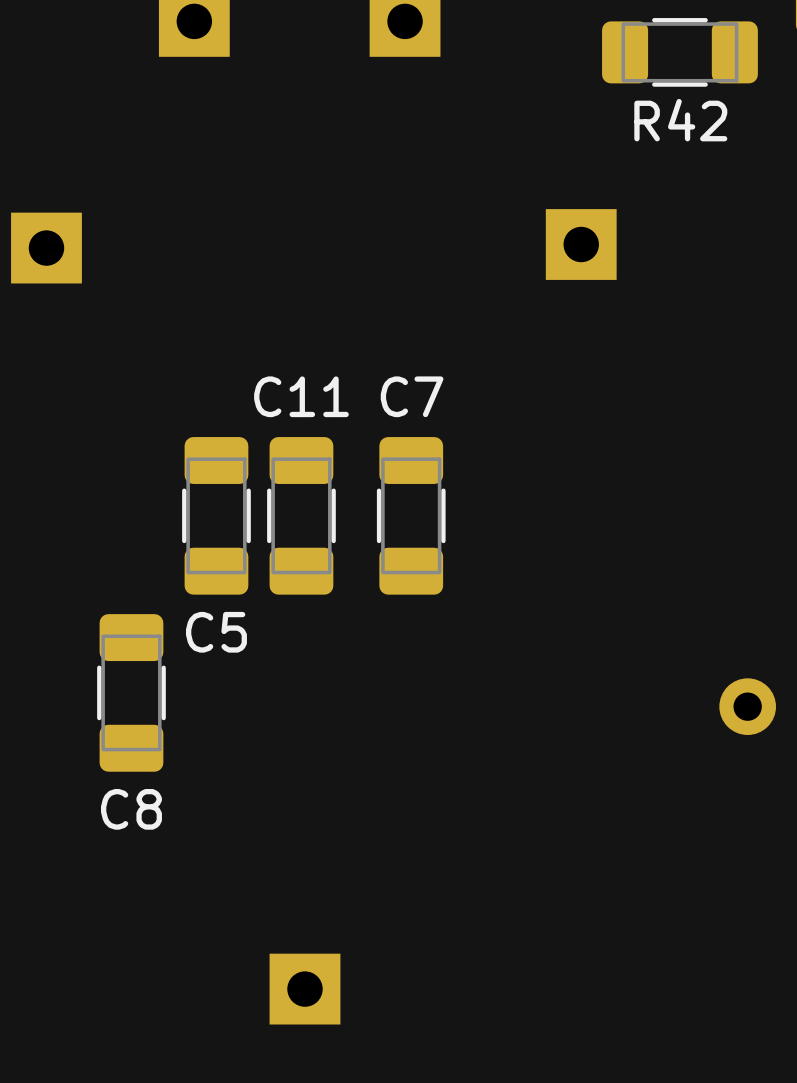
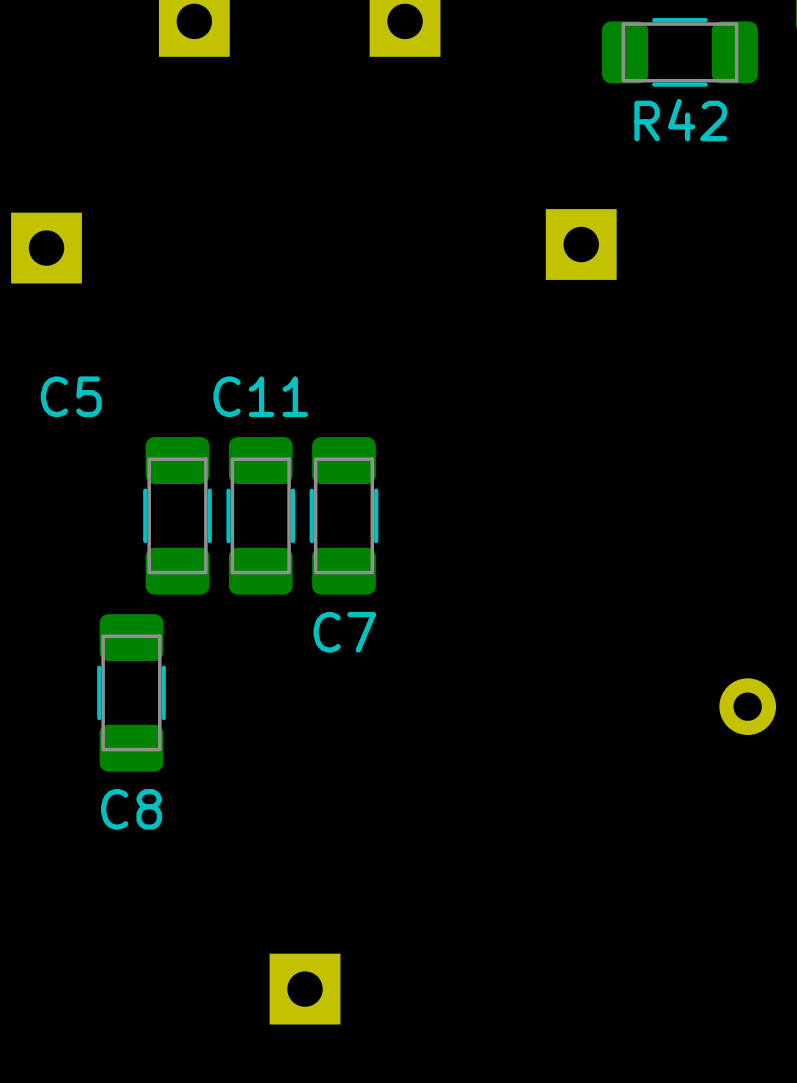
C7 name position: C7 (412, 396) -> C7 (344, 632)
C5 position: (216, 515) -> (177, 515)
C11 position: (301, 515) -> (260, 515)
C7 position: (411, 515) -> (343, 515)
C5 name position: C5 (216, 632) -> C5 (71, 396)

